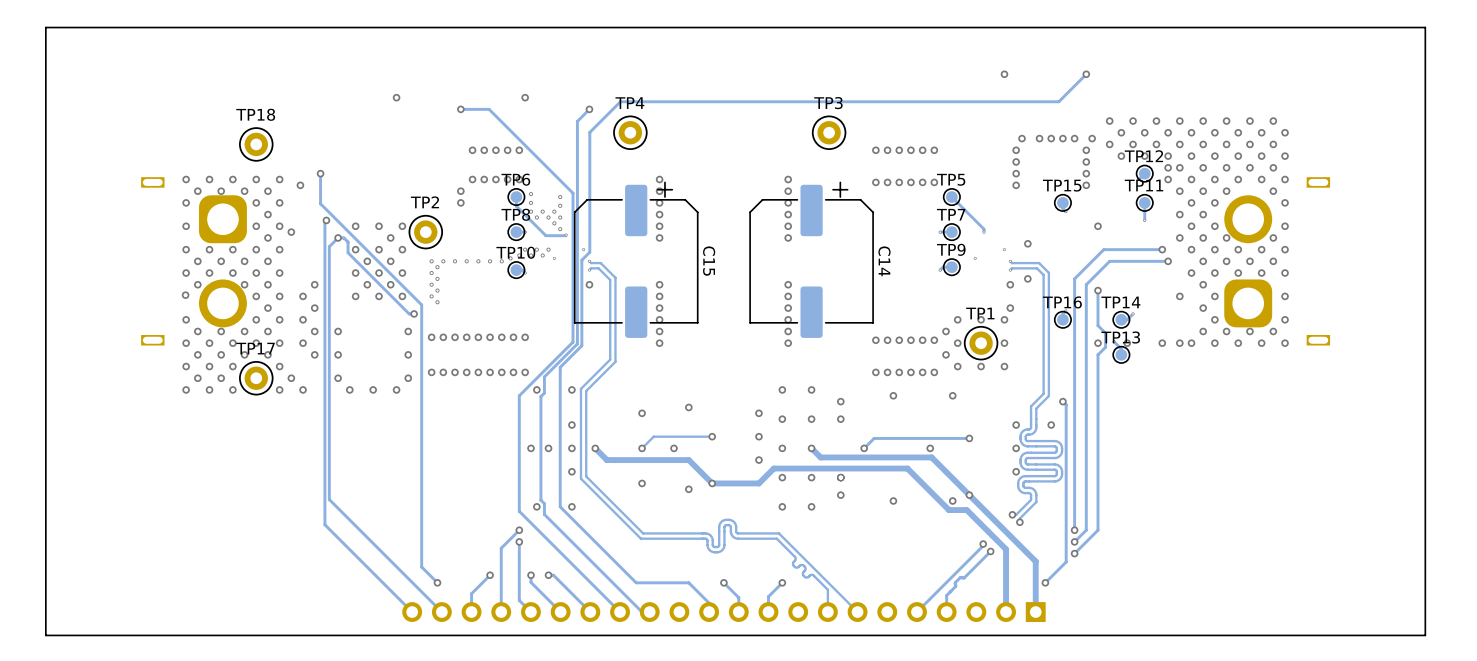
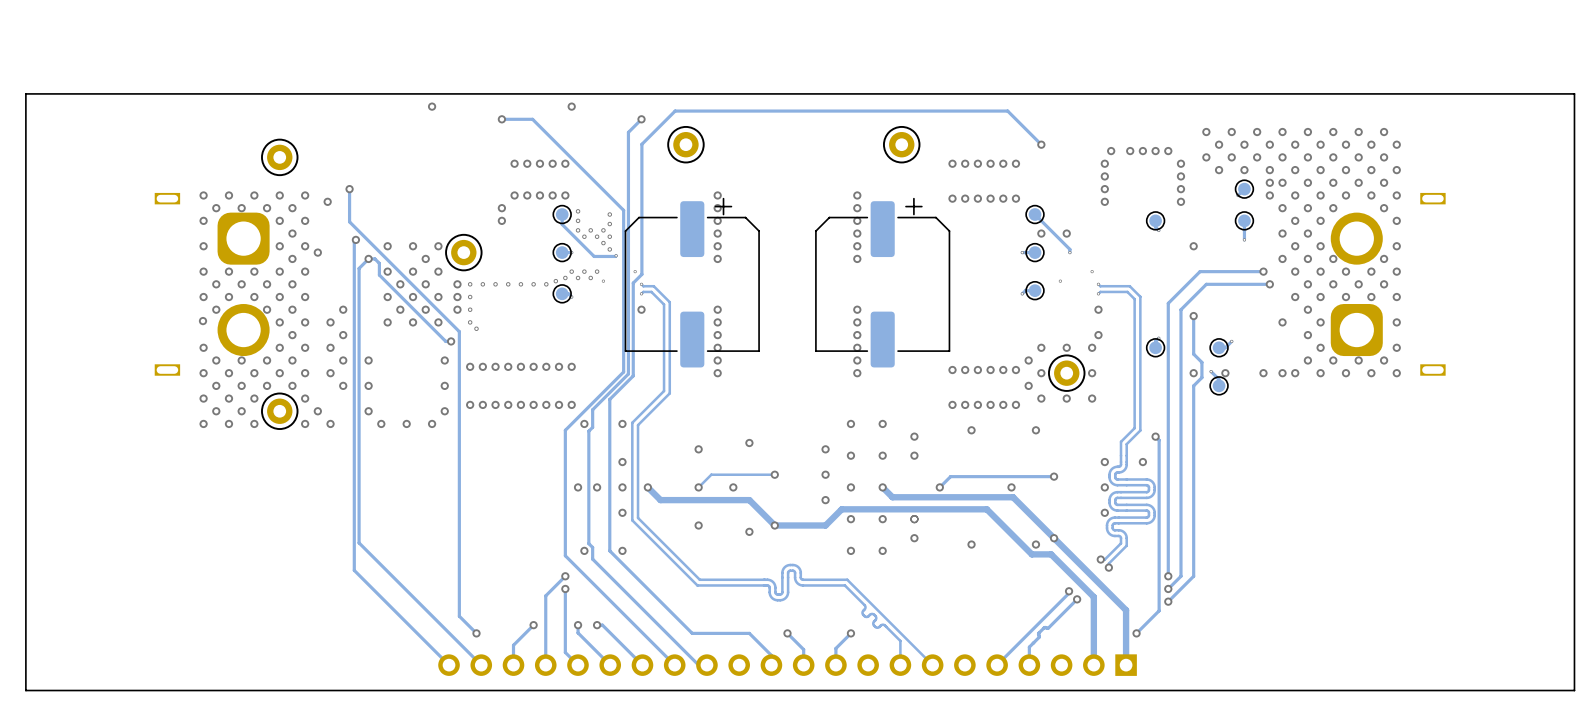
via: (1004, 74) -> none
track: (1086, 74) (1058, 101) (926, 101) -> (1041, 144) (1007, 111)
via: (1086, 74) -> none
TP4 name: TP4 (629, 103) -> none
TP3 name: TP3 (828, 103) -> none
TP18 name: TP18 (255, 114) -> none
via: none -> (1041, 144)
via: (1092, 138) -> none
TP12 name: TP12 (1143, 156) -> none
TP6 name: TP6 (515, 179) -> none
TP5 name: TP5 (951, 179) -> none
TP15 name: TP15 (1062, 185) -> none
TP11 name: TP11 (1143, 185) -> none
TP2 name: TP2 (424, 202) -> none
TP8 name: TP8 (515, 214) -> none
TP7 name: TP7 (951, 214) -> none
via: none -> (1041, 233)
via: none -> (1066, 233)
via: (1027, 243) -> none
TP9 name: TP9 (951, 249) -> none
TP10 name: TP10 (515, 252) -> none
via: none -> (457, 284)
C15 name: C15 (709, 261) -> none
C14 name: C14 (884, 261) -> none
via: (437, 267) -> none
via: none -> (457, 297)
via: (437, 278) -> none
via: (1027, 278) -> none
via: none -> (457, 309)
via: (437, 290) -> none
TP16 name: TP16 (1062, 302) -> none
TP14 name: TP14 (1120, 302) -> none
TP1 name: TP1 (980, 313) -> none
TP13 name: TP13 (1120, 337) -> none
TP17 name: TP17 (255, 348) -> none
board edge: (1425, 635) (1425, 27) (45, 27) (45, 635) -> (1549, 690) (1574, 690) (1574, 93) (25, 93) (25, 690) (51, 690)

